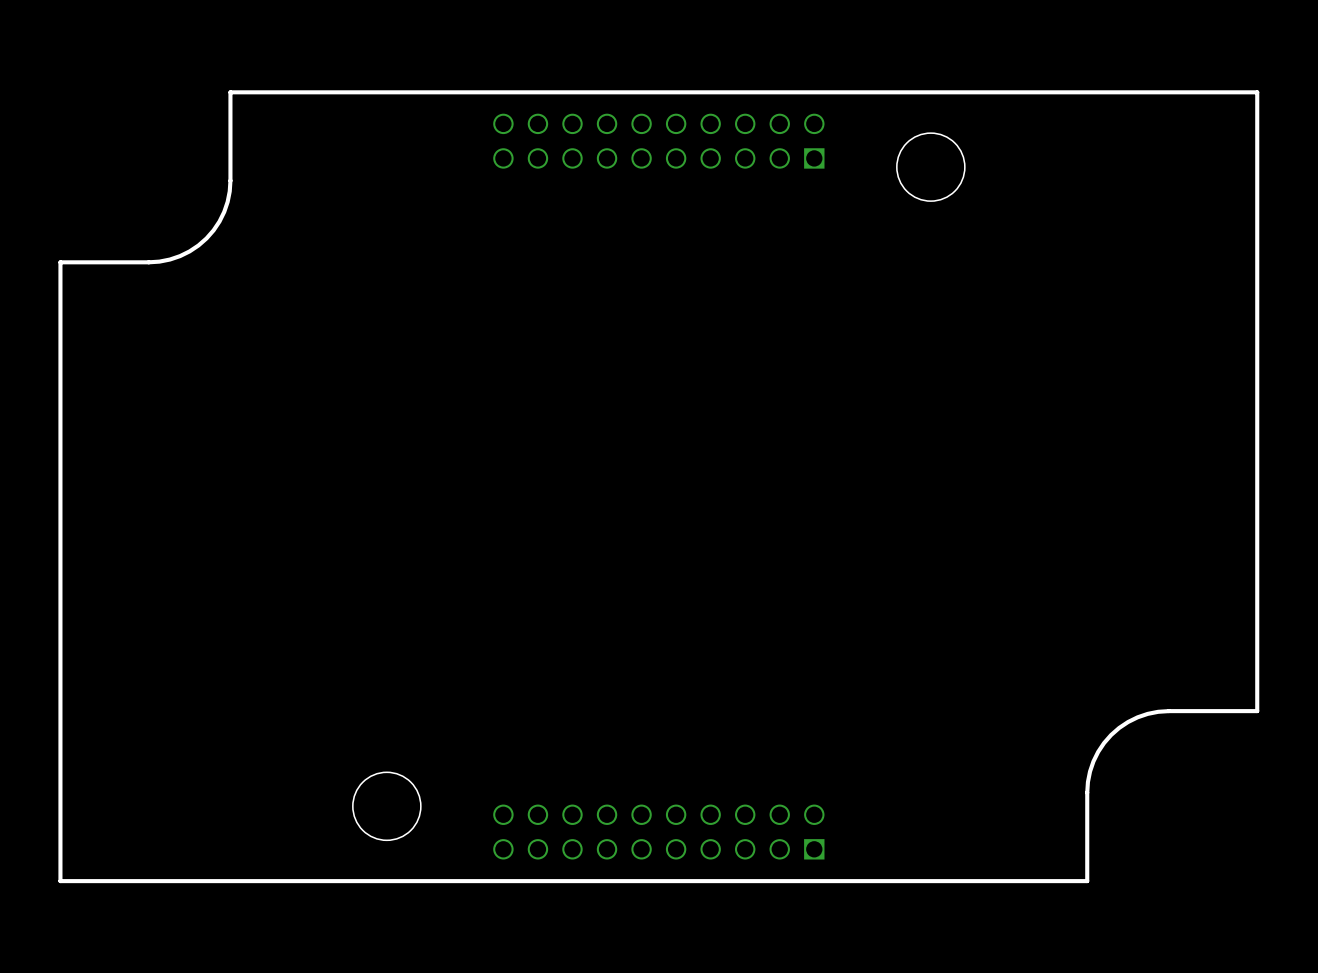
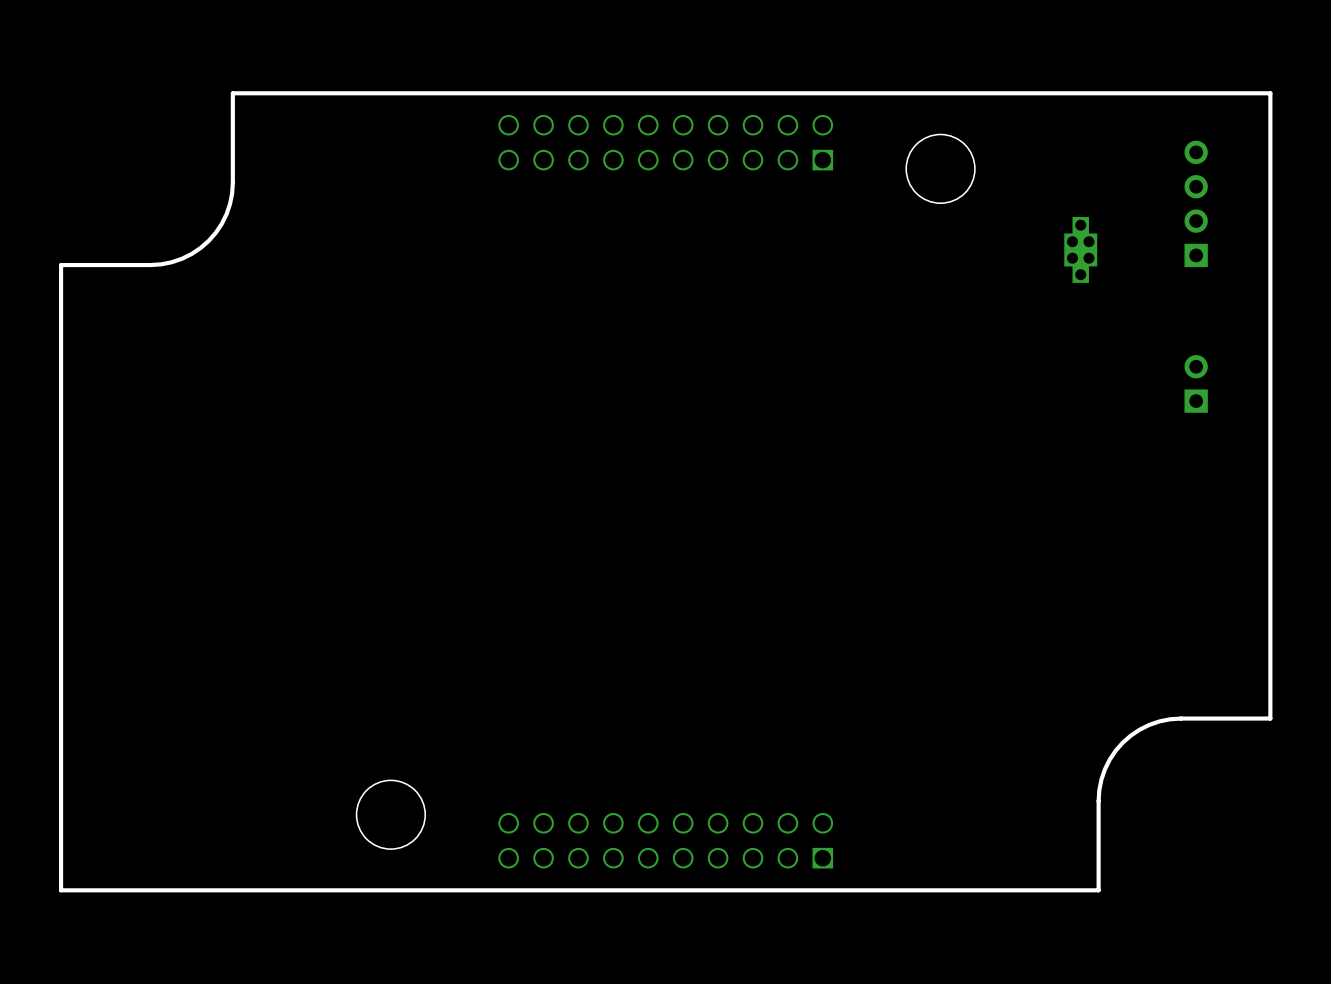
part: none -> (1196, 203)
part: none -> (1080, 249)
part: none -> (1196, 383)

